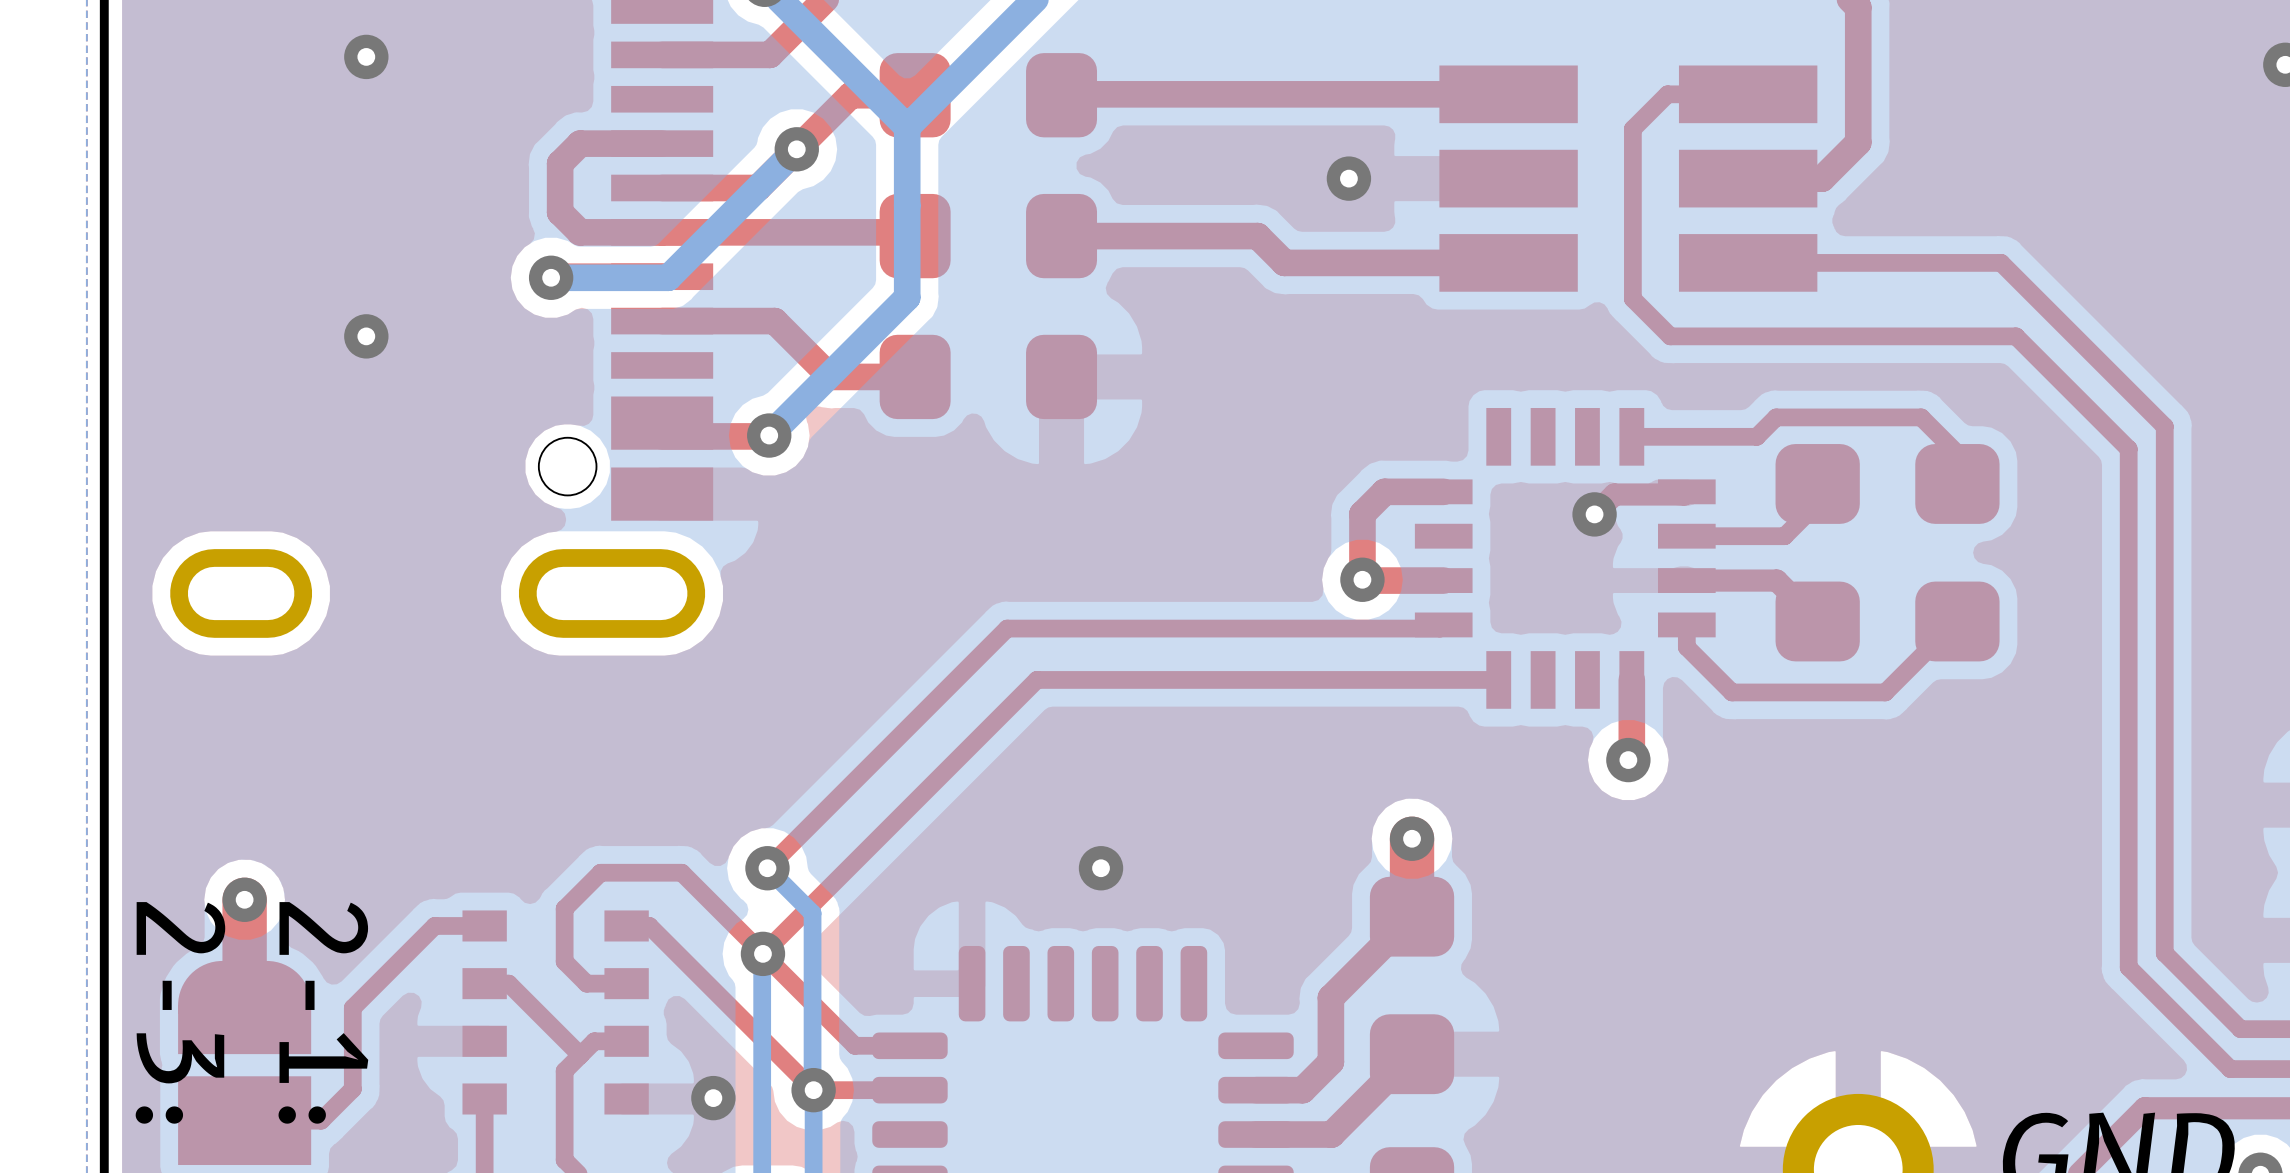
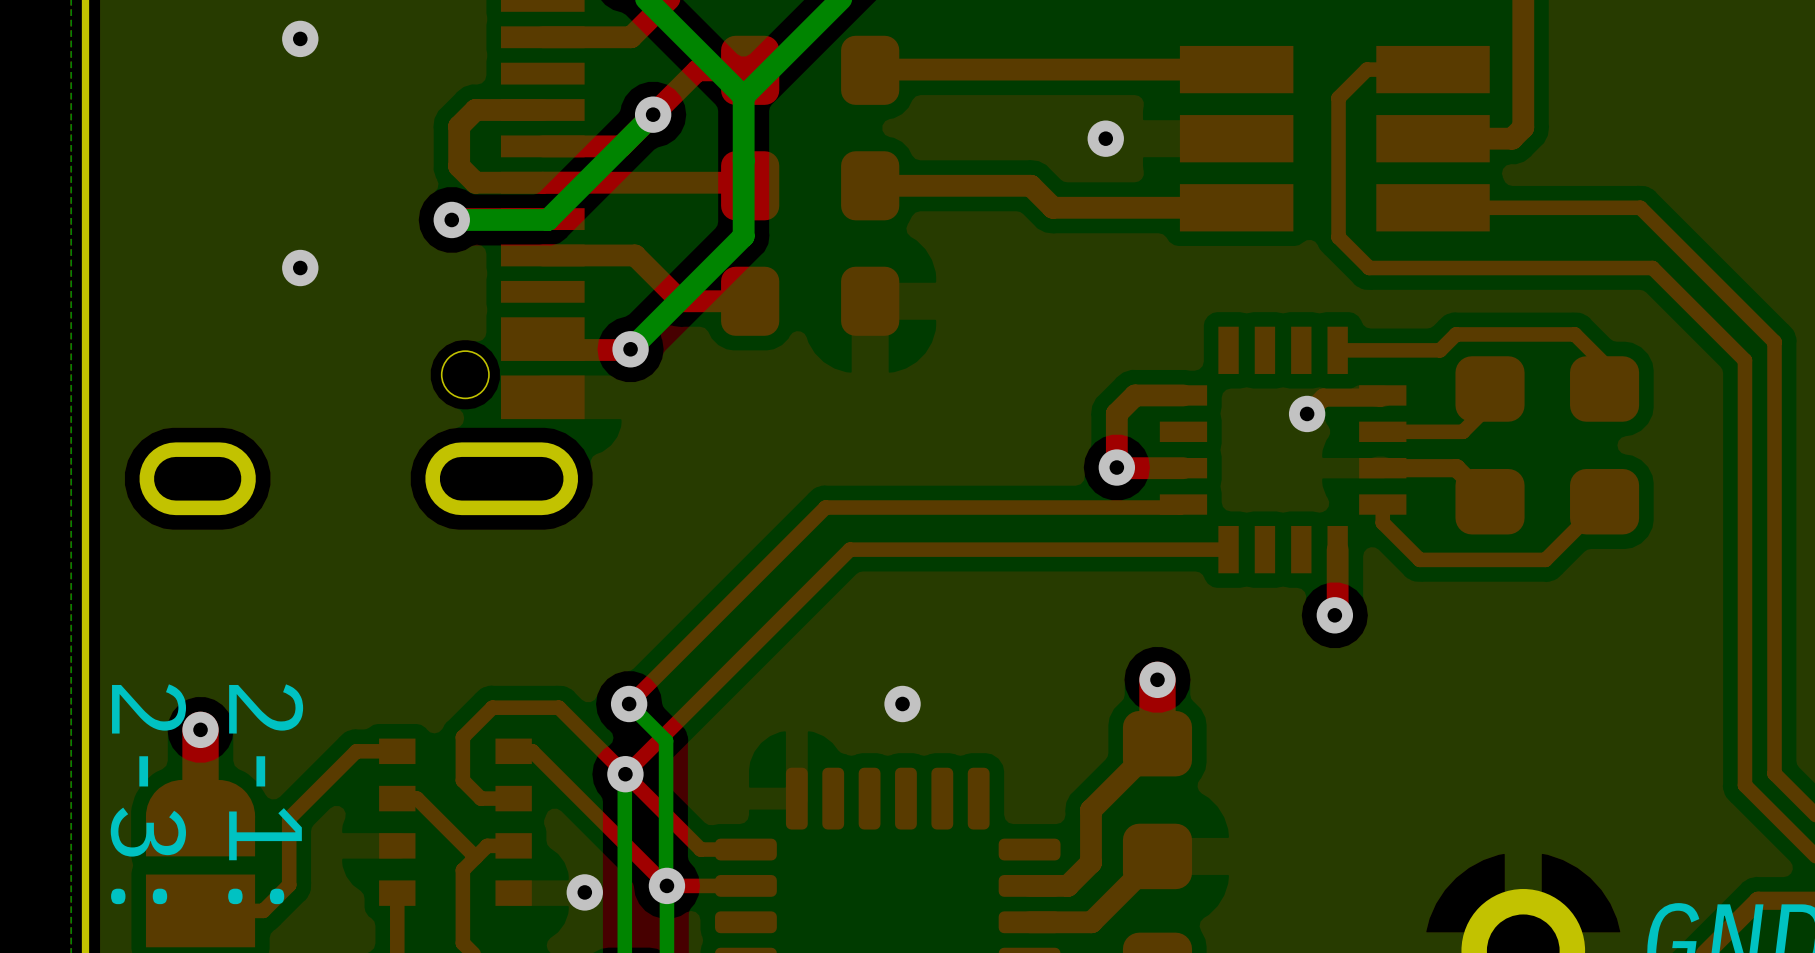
top track: (1858, 142) (1822, 178) -> (1523, 109) (1523, 127) (1512, 138) (1493, 138)

